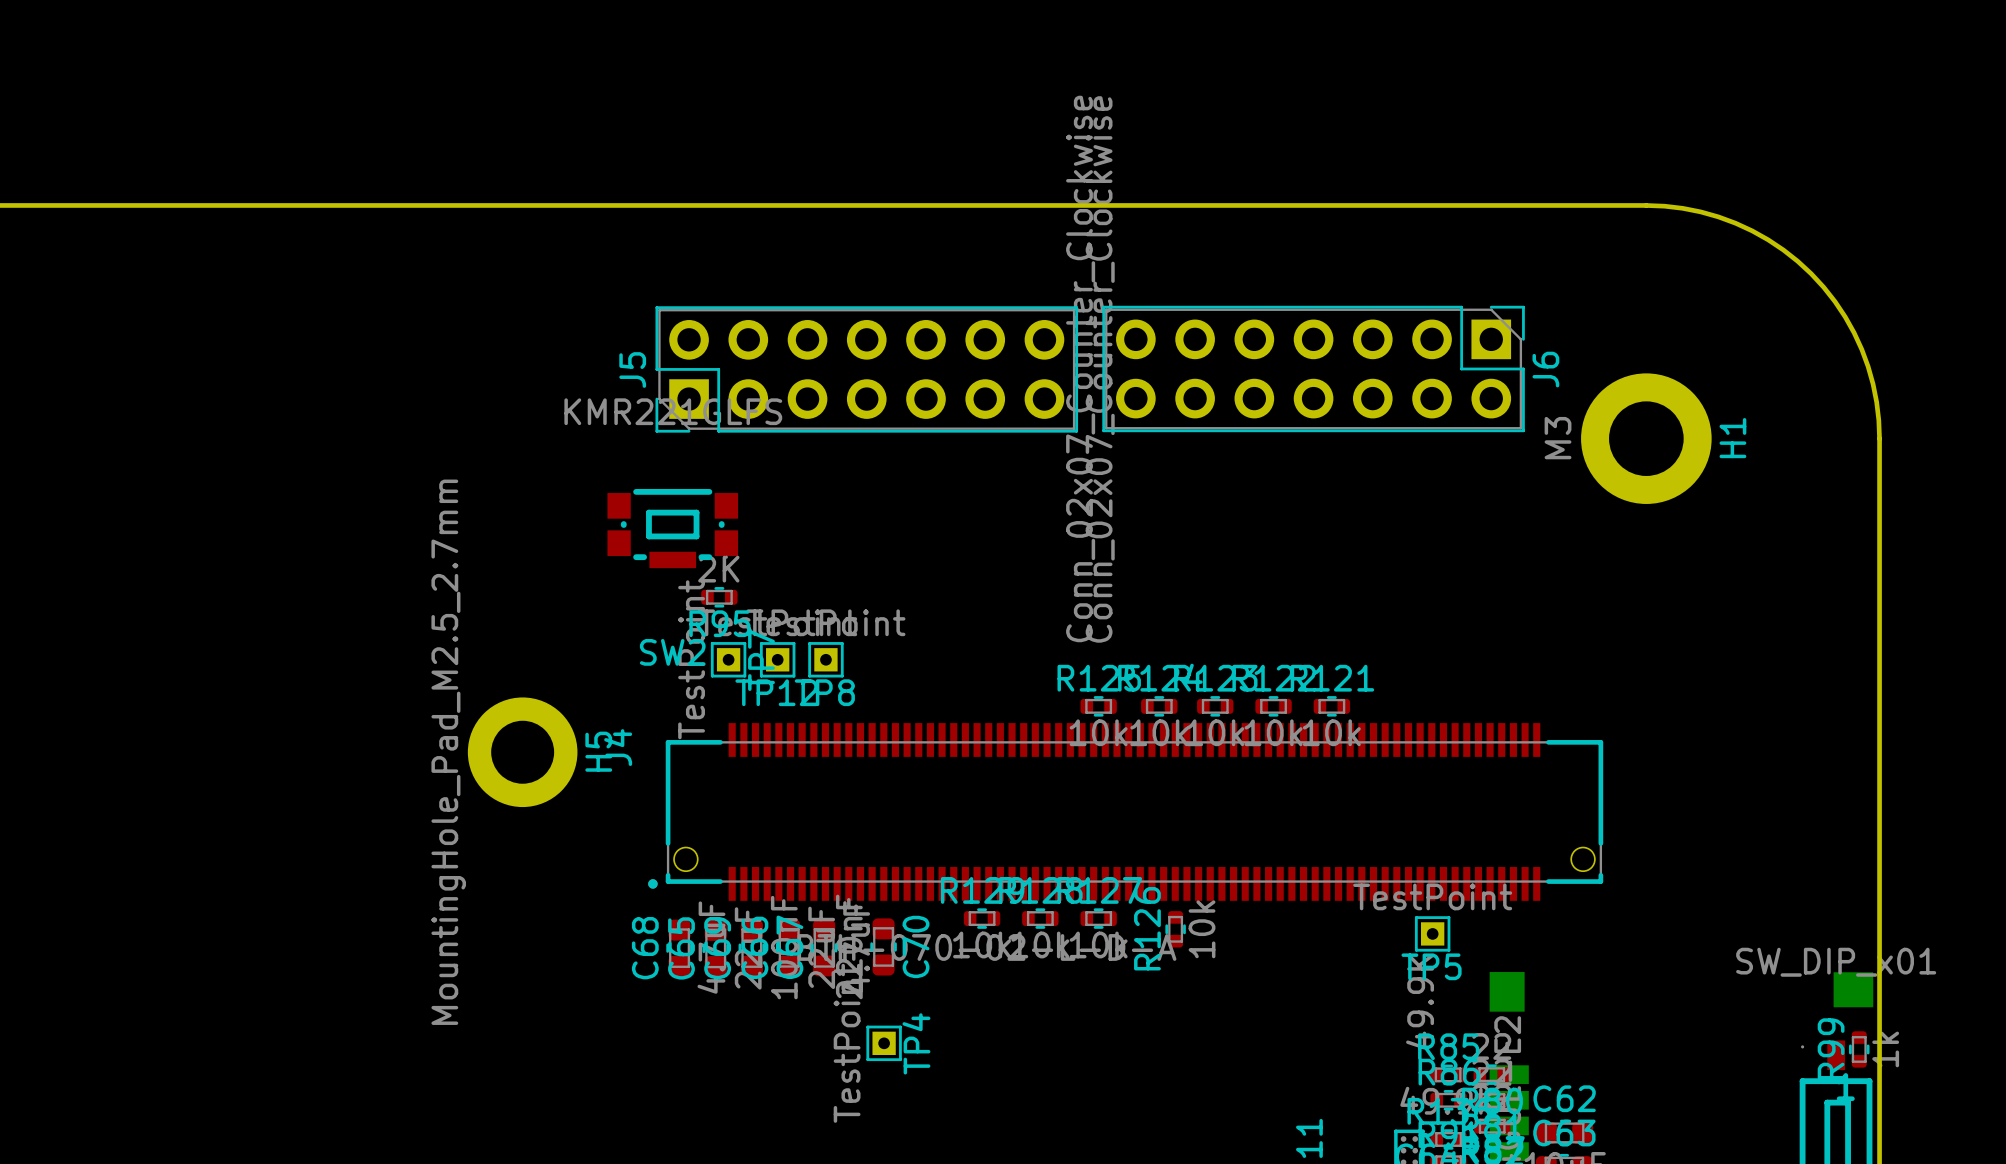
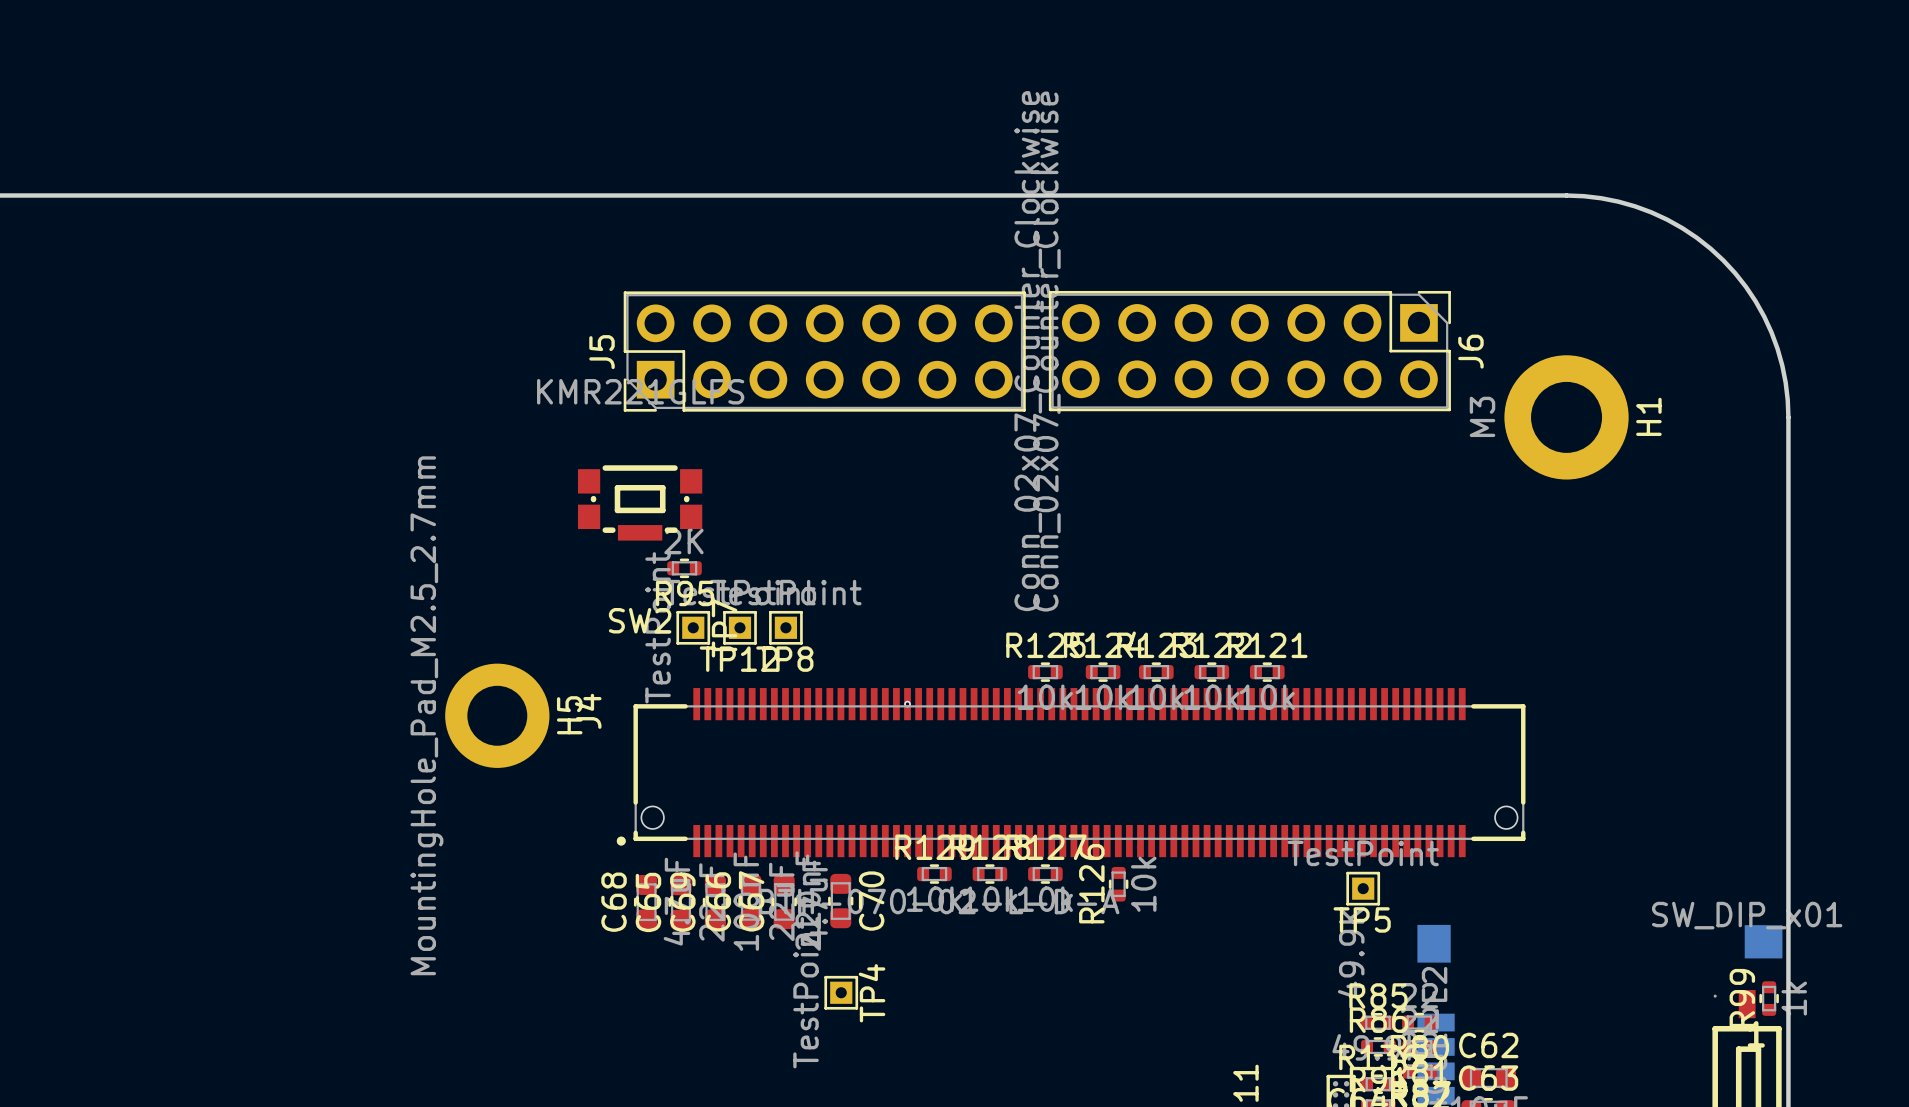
via: none -> (907, 704)

